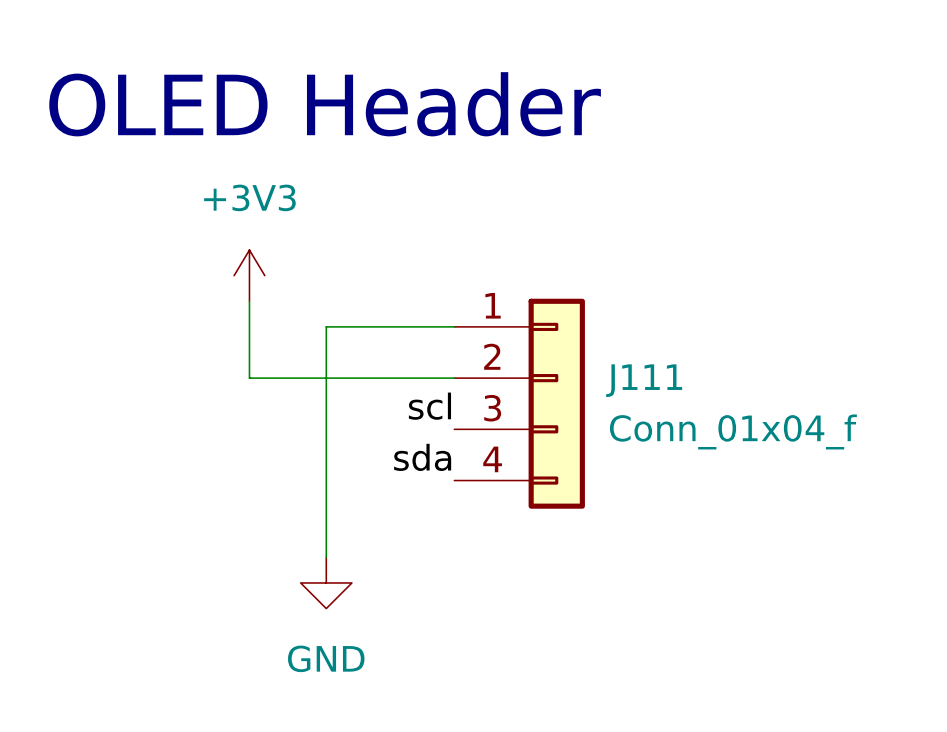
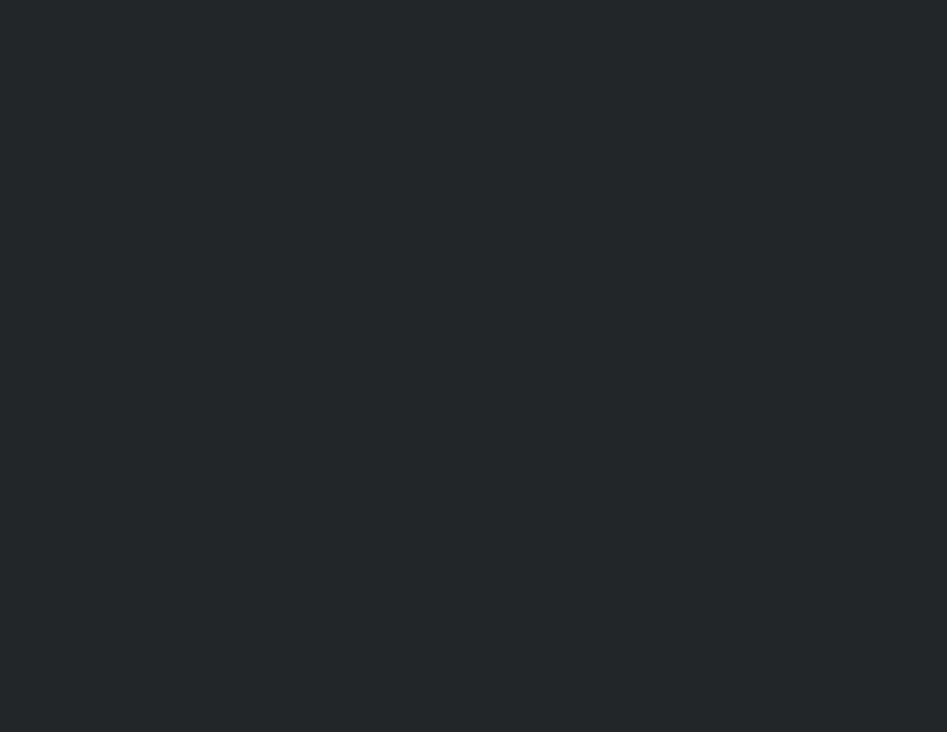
text: OLED Header (325, 104) -> none
power symbol: +3V3 (249, 275) -> none
wire: (249, 301) (249, 378) (454, 378) -> none
wire: (454, 326) (326, 326) (326, 557) -> none
J111: Conn_01x04_f (519, 403) -> none
label: scl (429, 406) -> none
label: sda (422, 457) -> none
power symbol: GND (326, 582) -> none

